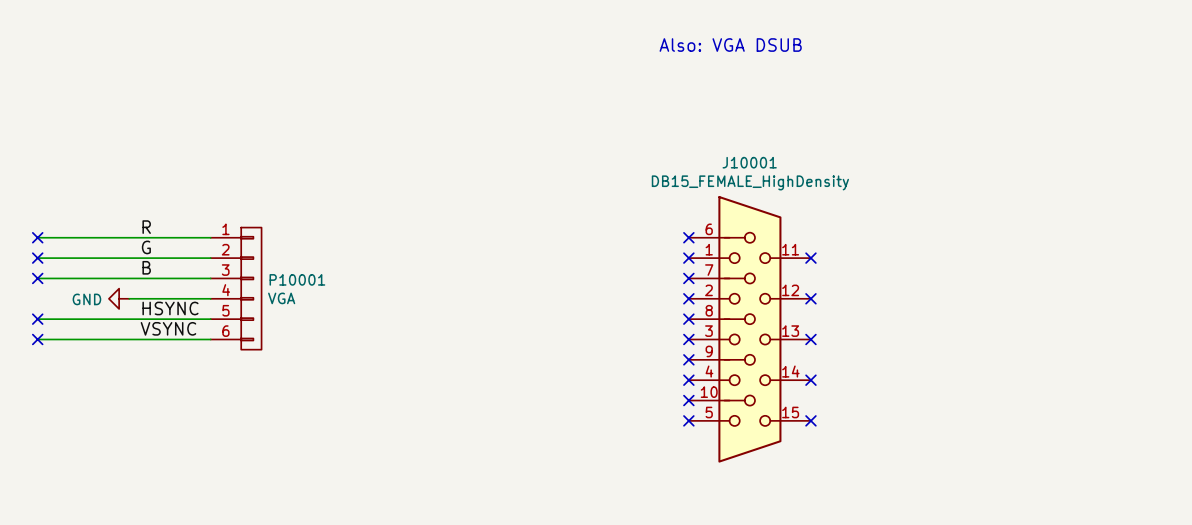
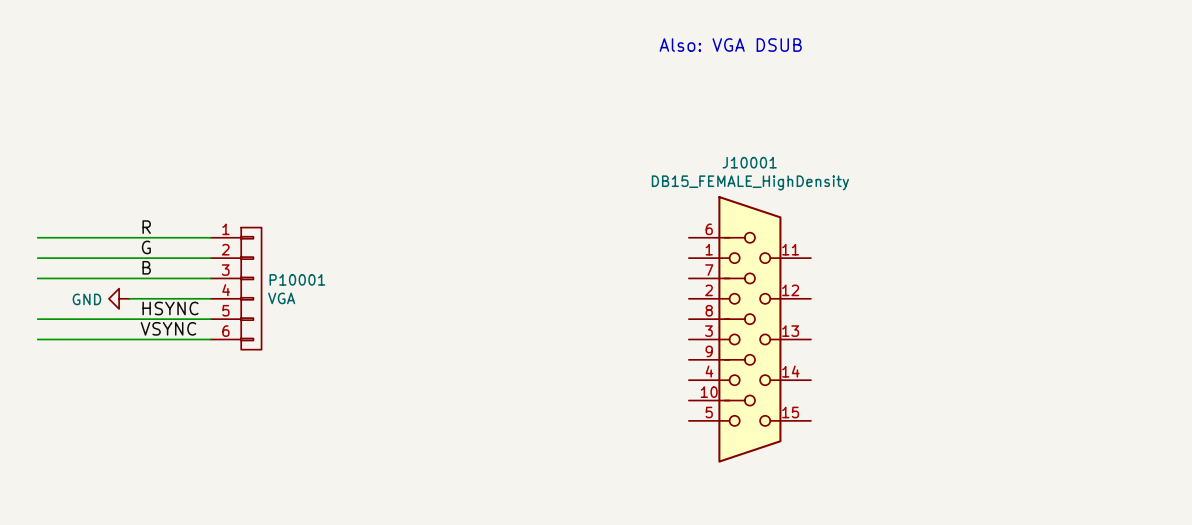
no-connect mark: (37, 237) -> none
no-connect mark: (688, 237) -> none
no-connect mark: (37, 258) -> none
no-connect mark: (688, 258) -> none
no-connect mark: (810, 258) -> none
no-connect mark: (37, 278) -> none
no-connect mark: (688, 278) -> none
no-connect mark: (688, 298) -> none
no-connect mark: (810, 298) -> none
no-connect mark: (37, 319) -> none
no-connect mark: (688, 319) -> none
no-connect mark: (37, 339) -> none
no-connect mark: (688, 339) -> none
no-connect mark: (810, 339) -> none
no-connect mark: (688, 359) -> none
no-connect mark: (688, 380) -> none
no-connect mark: (810, 380) -> none
no-connect mark: (688, 400) -> none
no-connect mark: (688, 420) -> none
no-connect mark: (810, 420) -> none

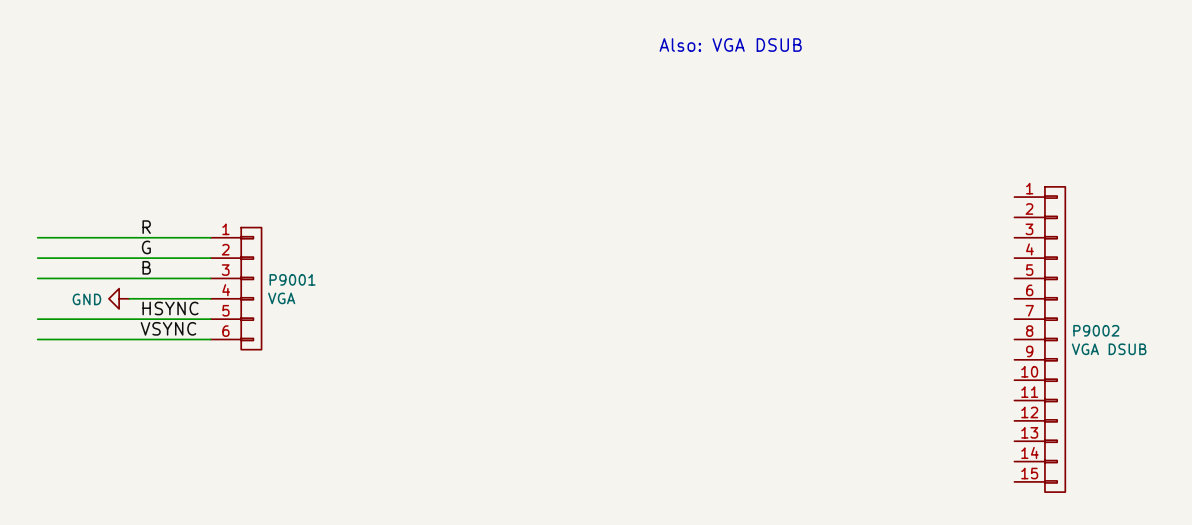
P10001 name: P10001 (297, 279) -> P9001 (292, 279)
J10001: DB15_FEMALE_HighDensity (749, 329) -> none
P9002: none -> VGA DSUB (1039, 339)

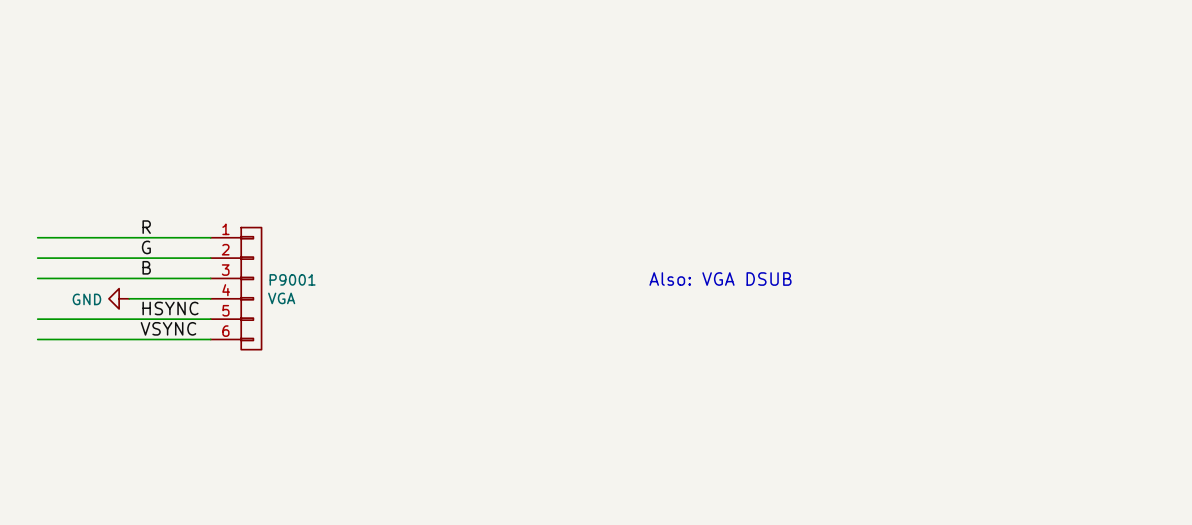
text: Also: VGA DSUB (730, 45) -> none
text: none -> Also: VGA DSUB (720, 279)
P9002: VGA DSUB (1039, 339) -> none

